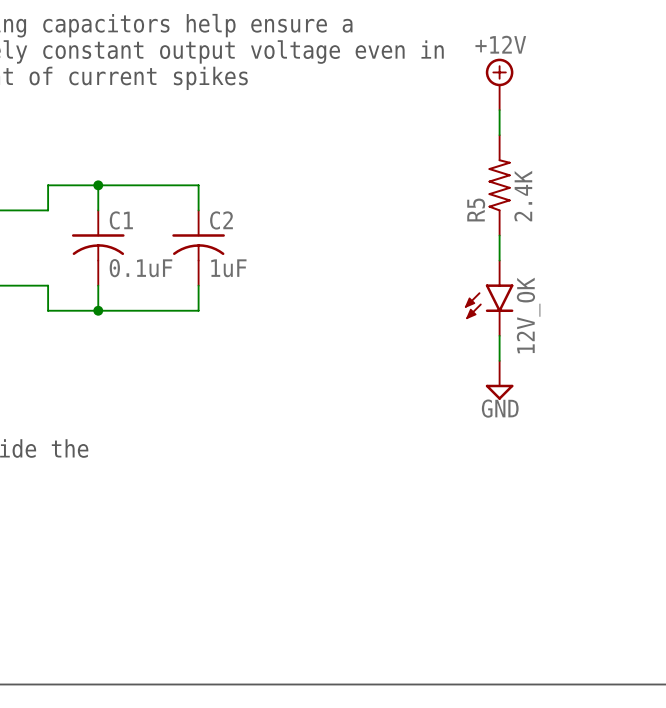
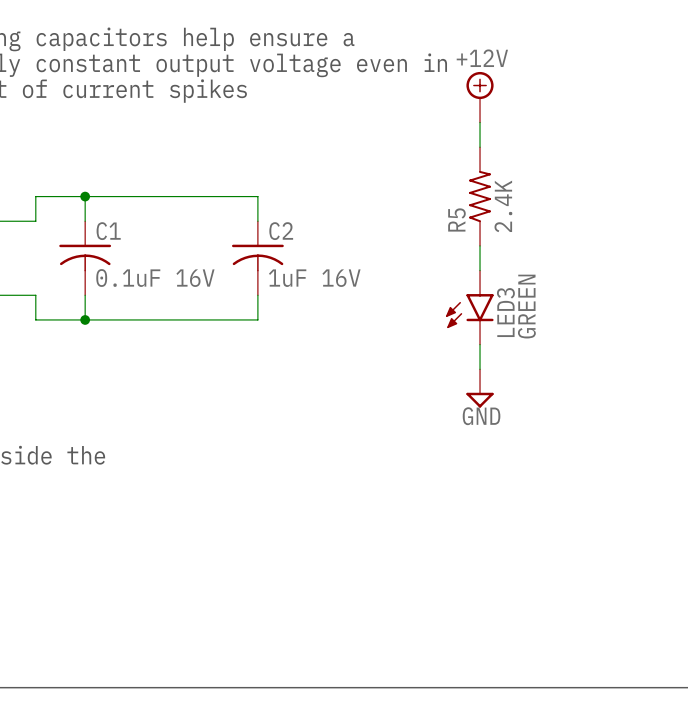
wire: (198, 185) (198, 210) -> (183, 196) (257, 196) (257, 221)
C2 position: (198, 248) -> (257, 258)
C1 value: 0.1uF (140, 268) -> 0.1uF 16V (155, 278)
C2 value: 1uF (228, 268) -> 1uF 16V (314, 278)
wire: (198, 285) (198, 310) -> (257, 295) (257, 319) (183, 319)
12V_OK value: none -> GREEN (526, 306)
12V_OK name: 12V_OK (528, 315) -> LED3 (505, 312)

